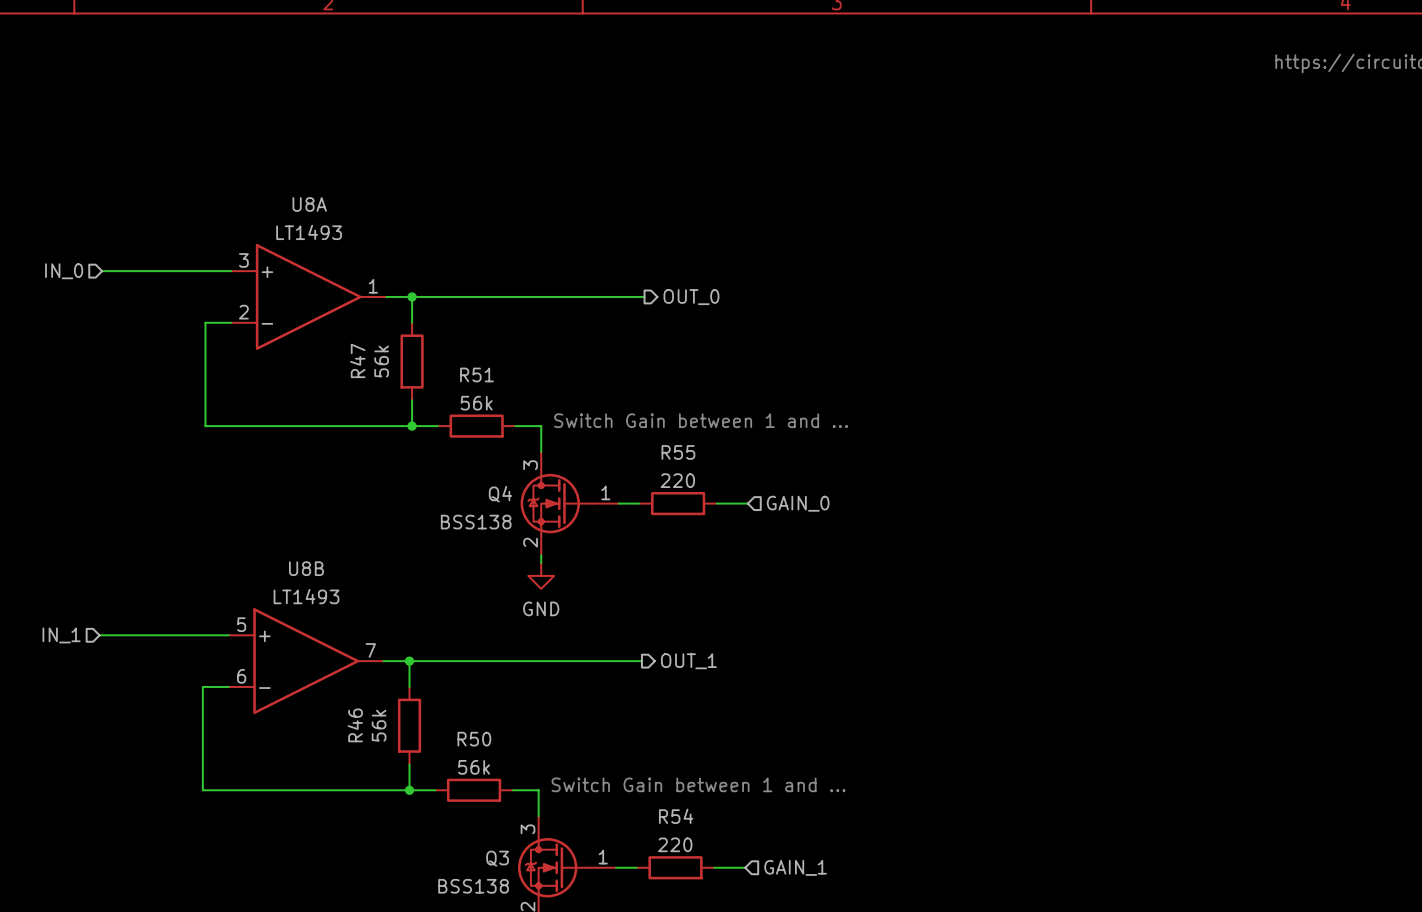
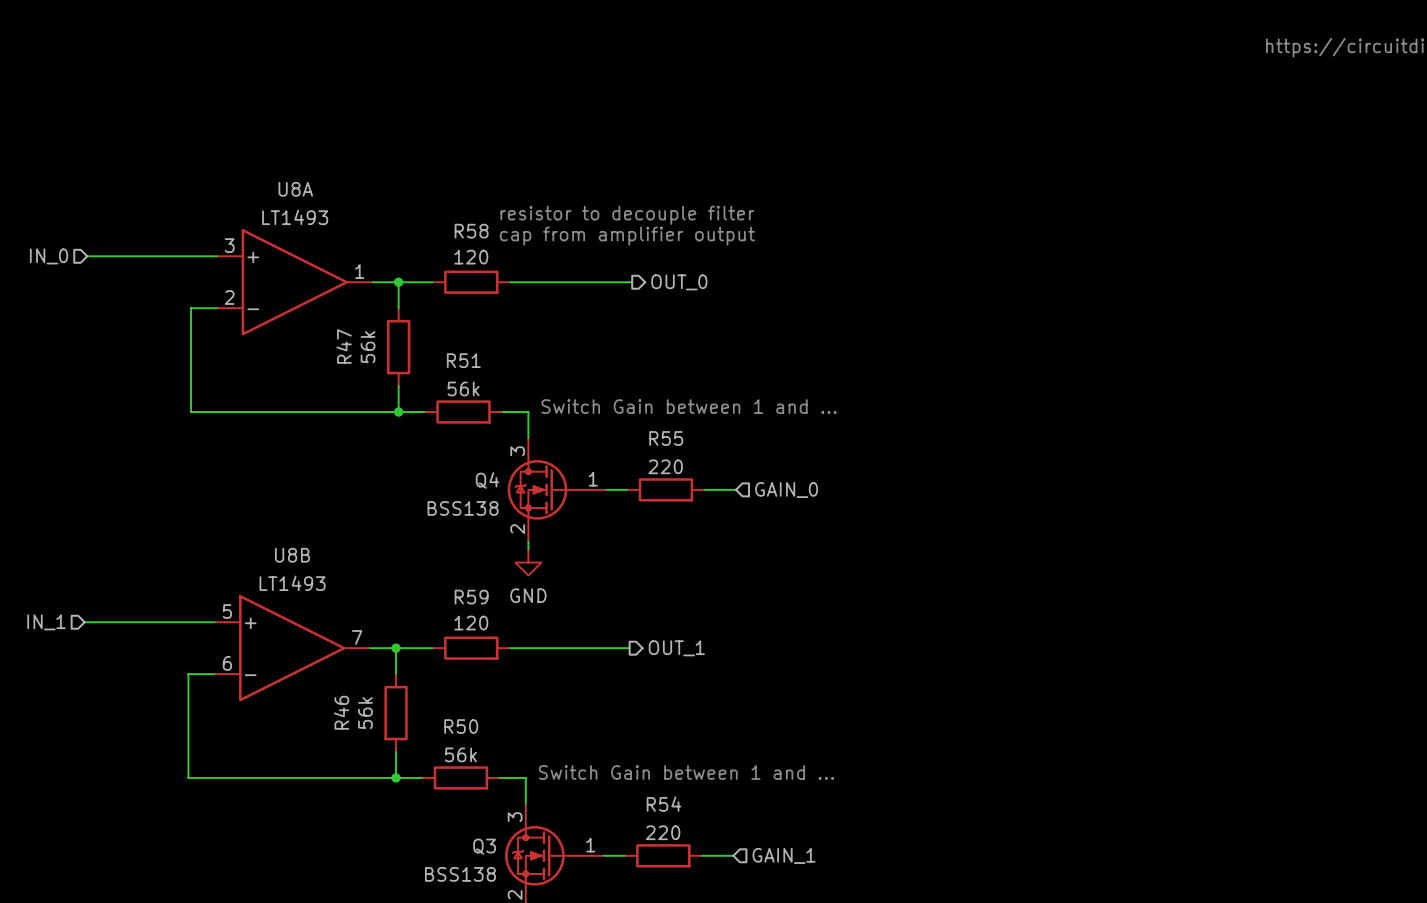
text: none -> resistor to decouple filter (627, 215)
text: none -> cap from amplifier output (627, 236)
wire: (445, 296) (523, 296) -> none
R58: none -> 120 (471, 282)
wire: (445, 661) (523, 661) -> none
R59: none -> 120 (471, 648)

